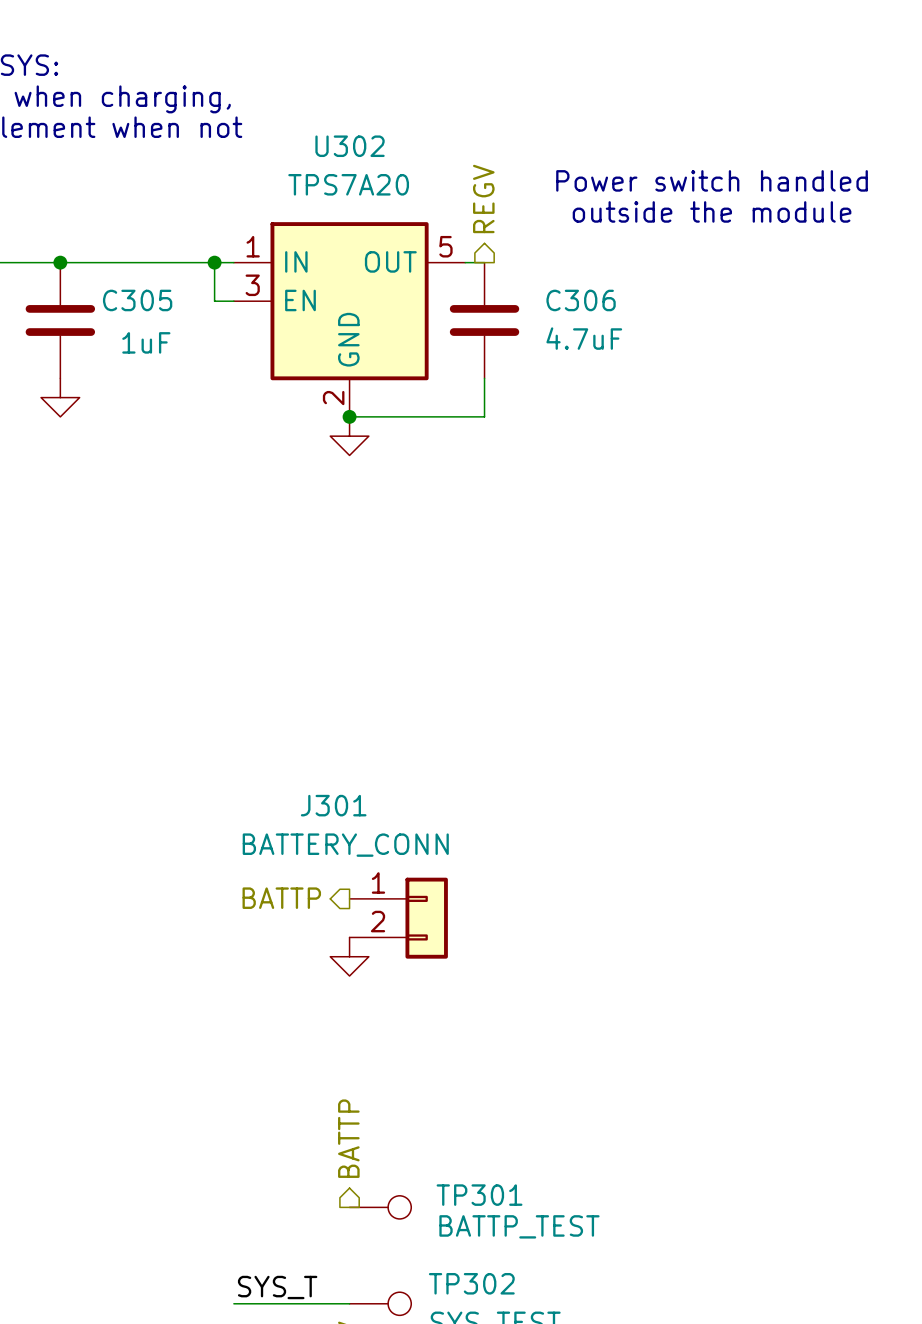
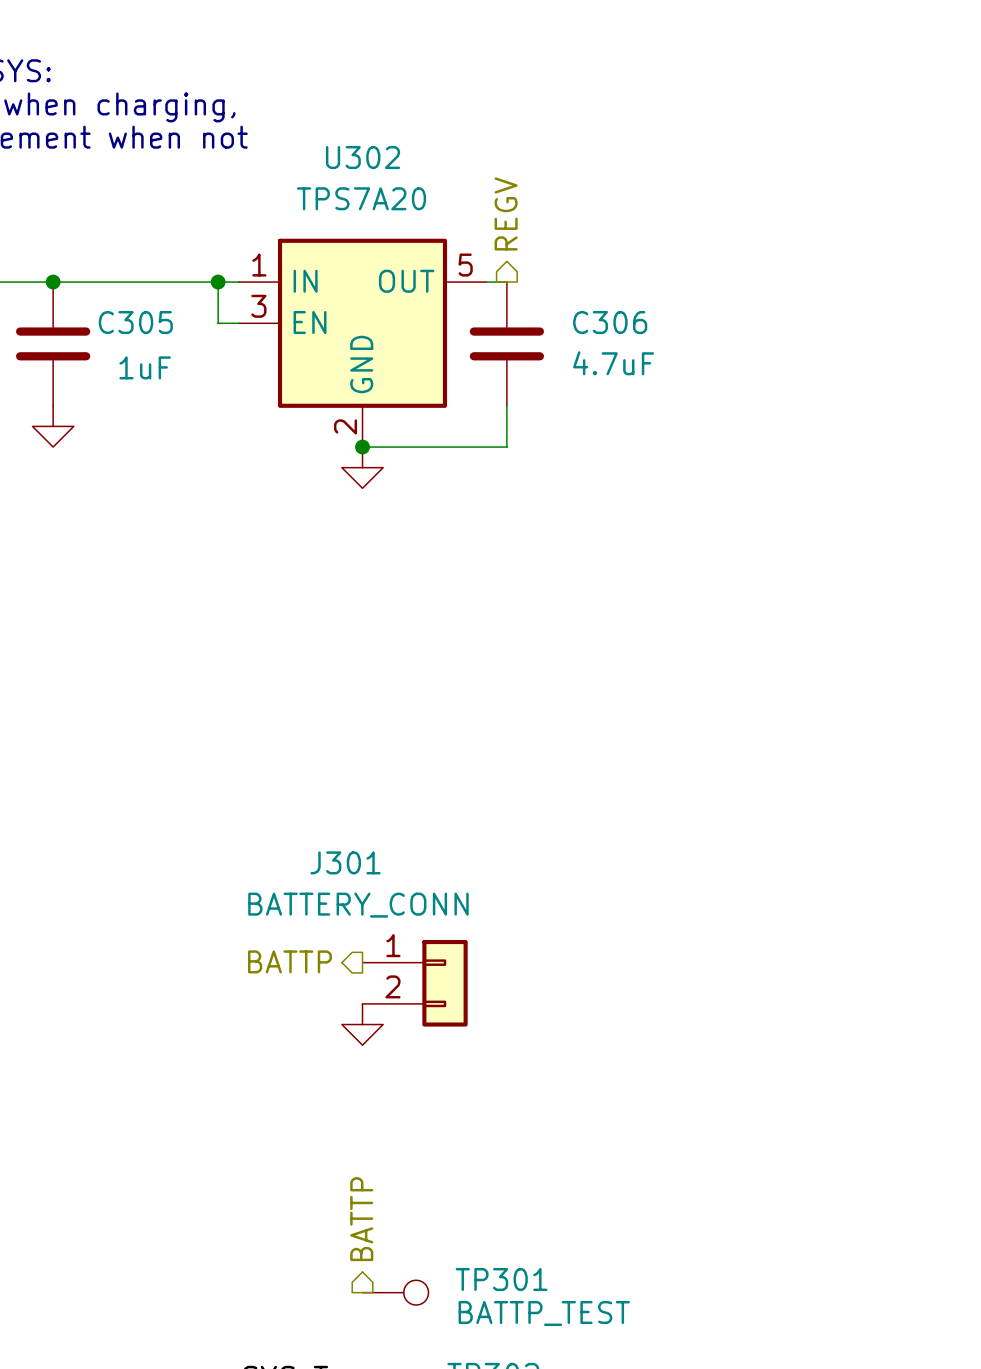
text: Power switch handled (712, 180) -> none
text: outside the module (712, 211) -> none

